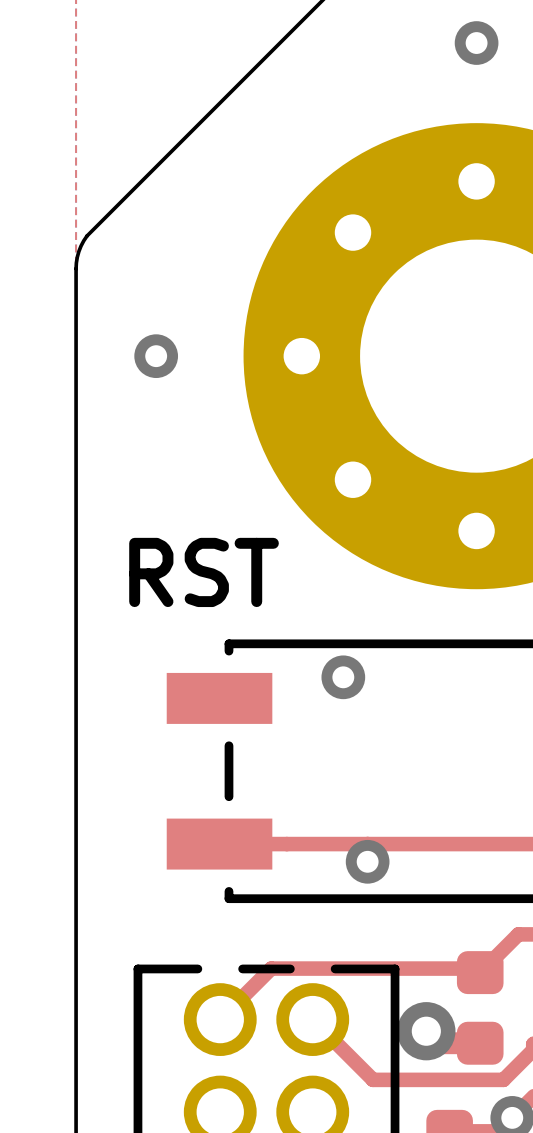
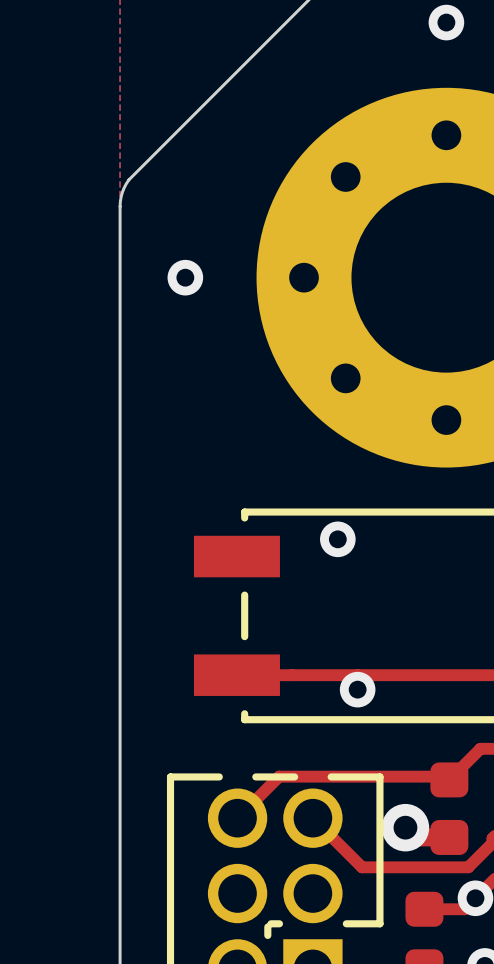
text: RST (204, 572) -> none

